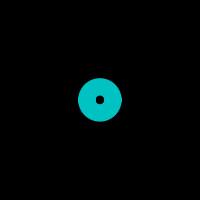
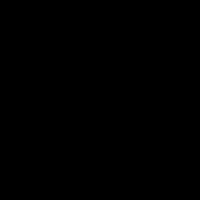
part: (99, 99) -> none

